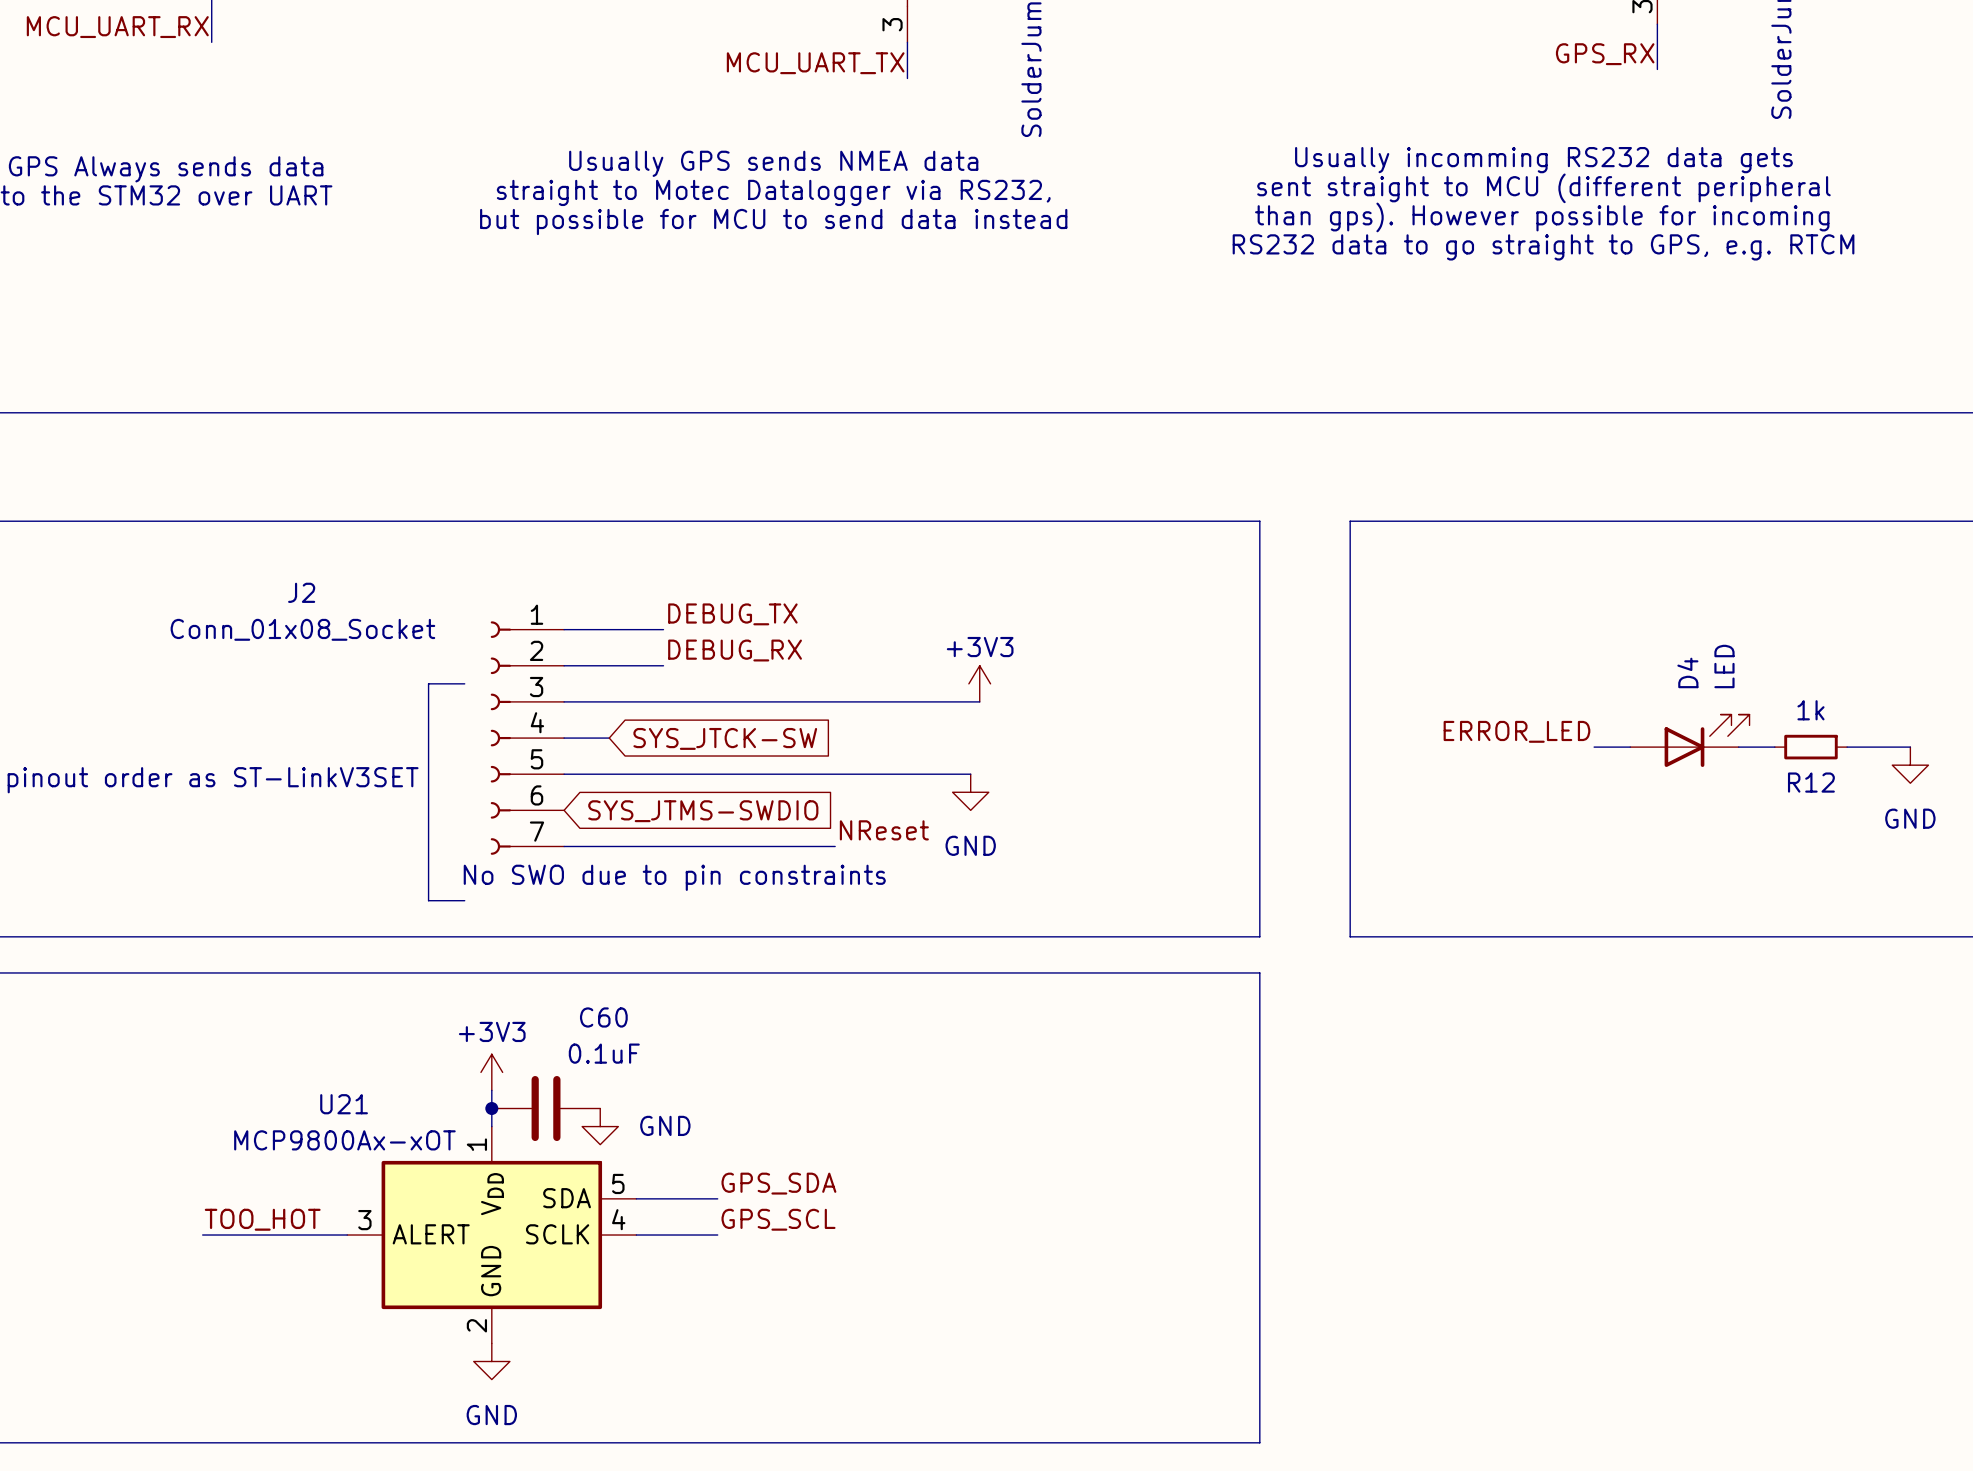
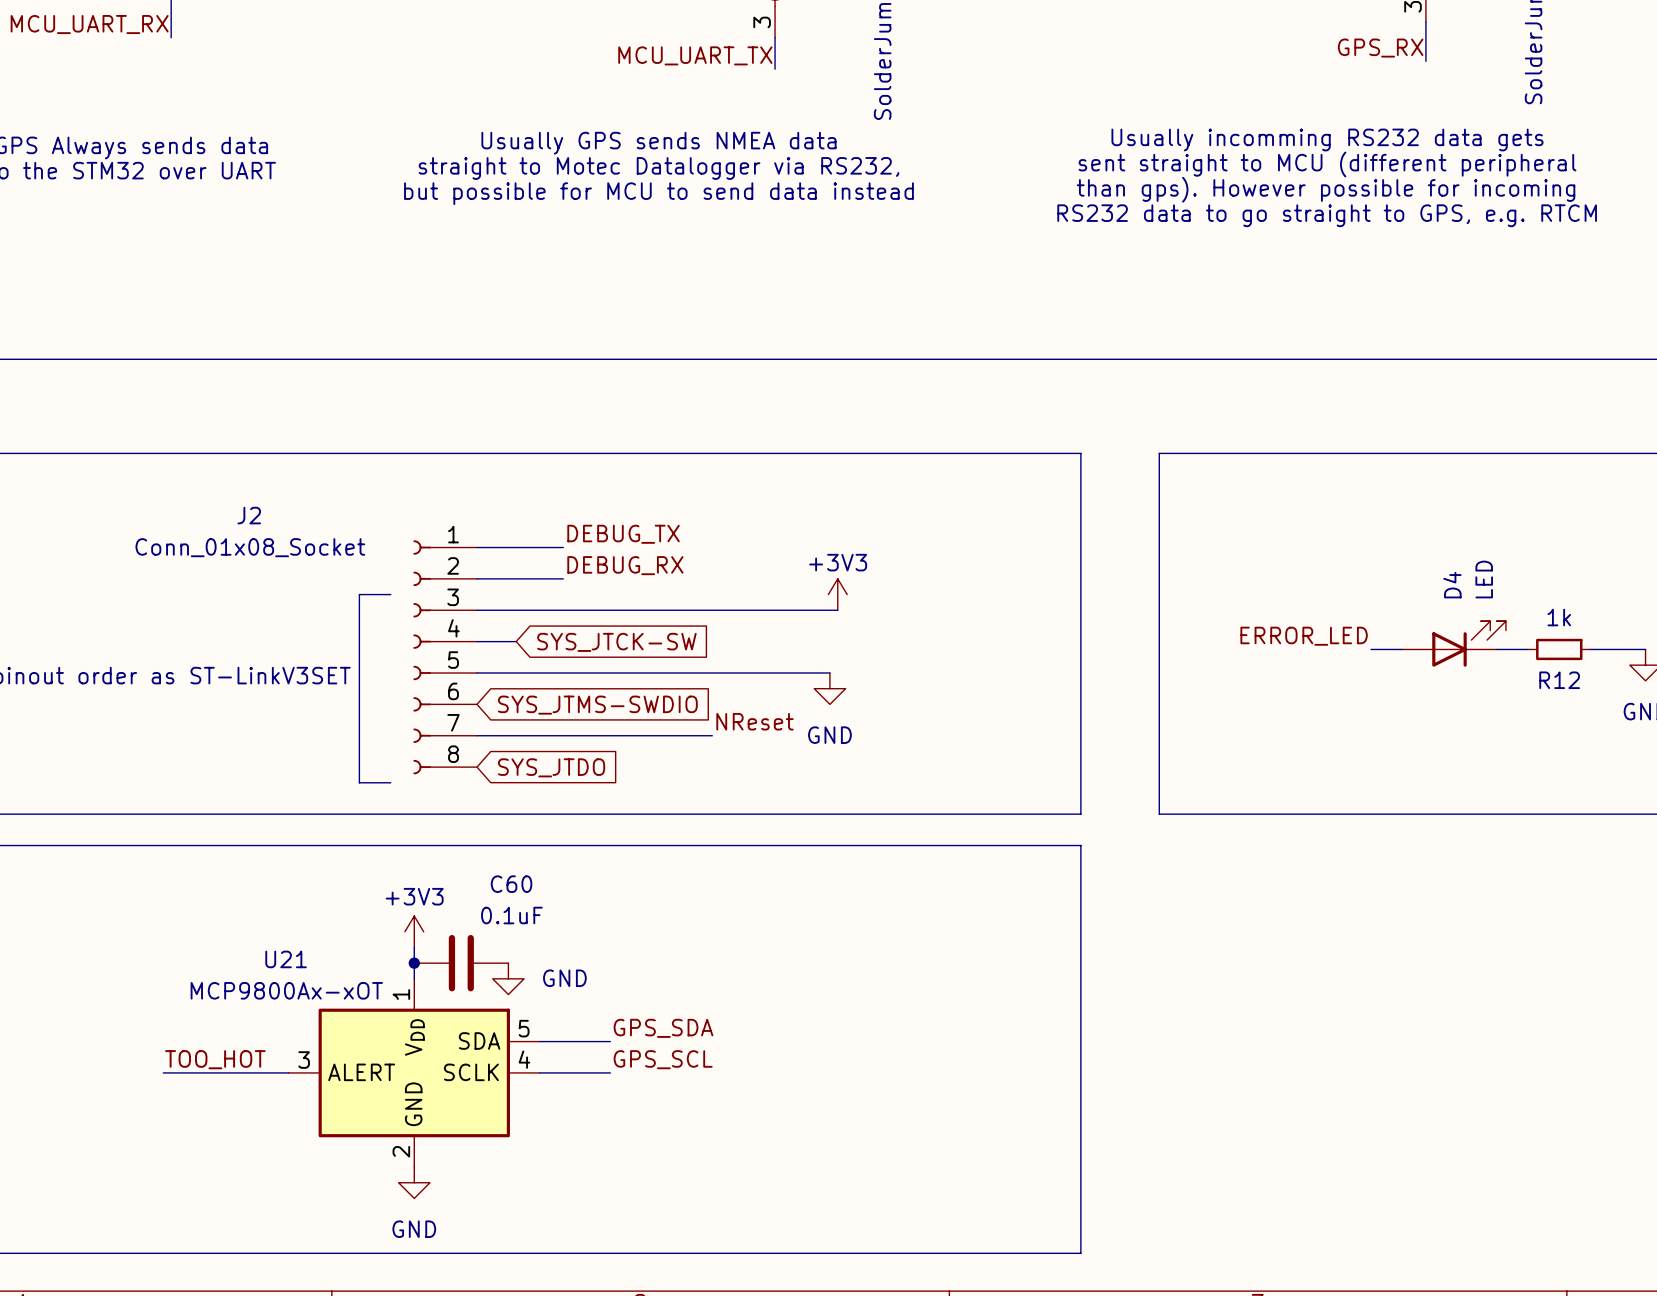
J2 symbol: [490, 621, 565, 855] -> [413, 540, 478, 775]
text: No SWO due to pin constraints (674, 877) -> none
global label: none -> SYS_JTDO (551, 767)

